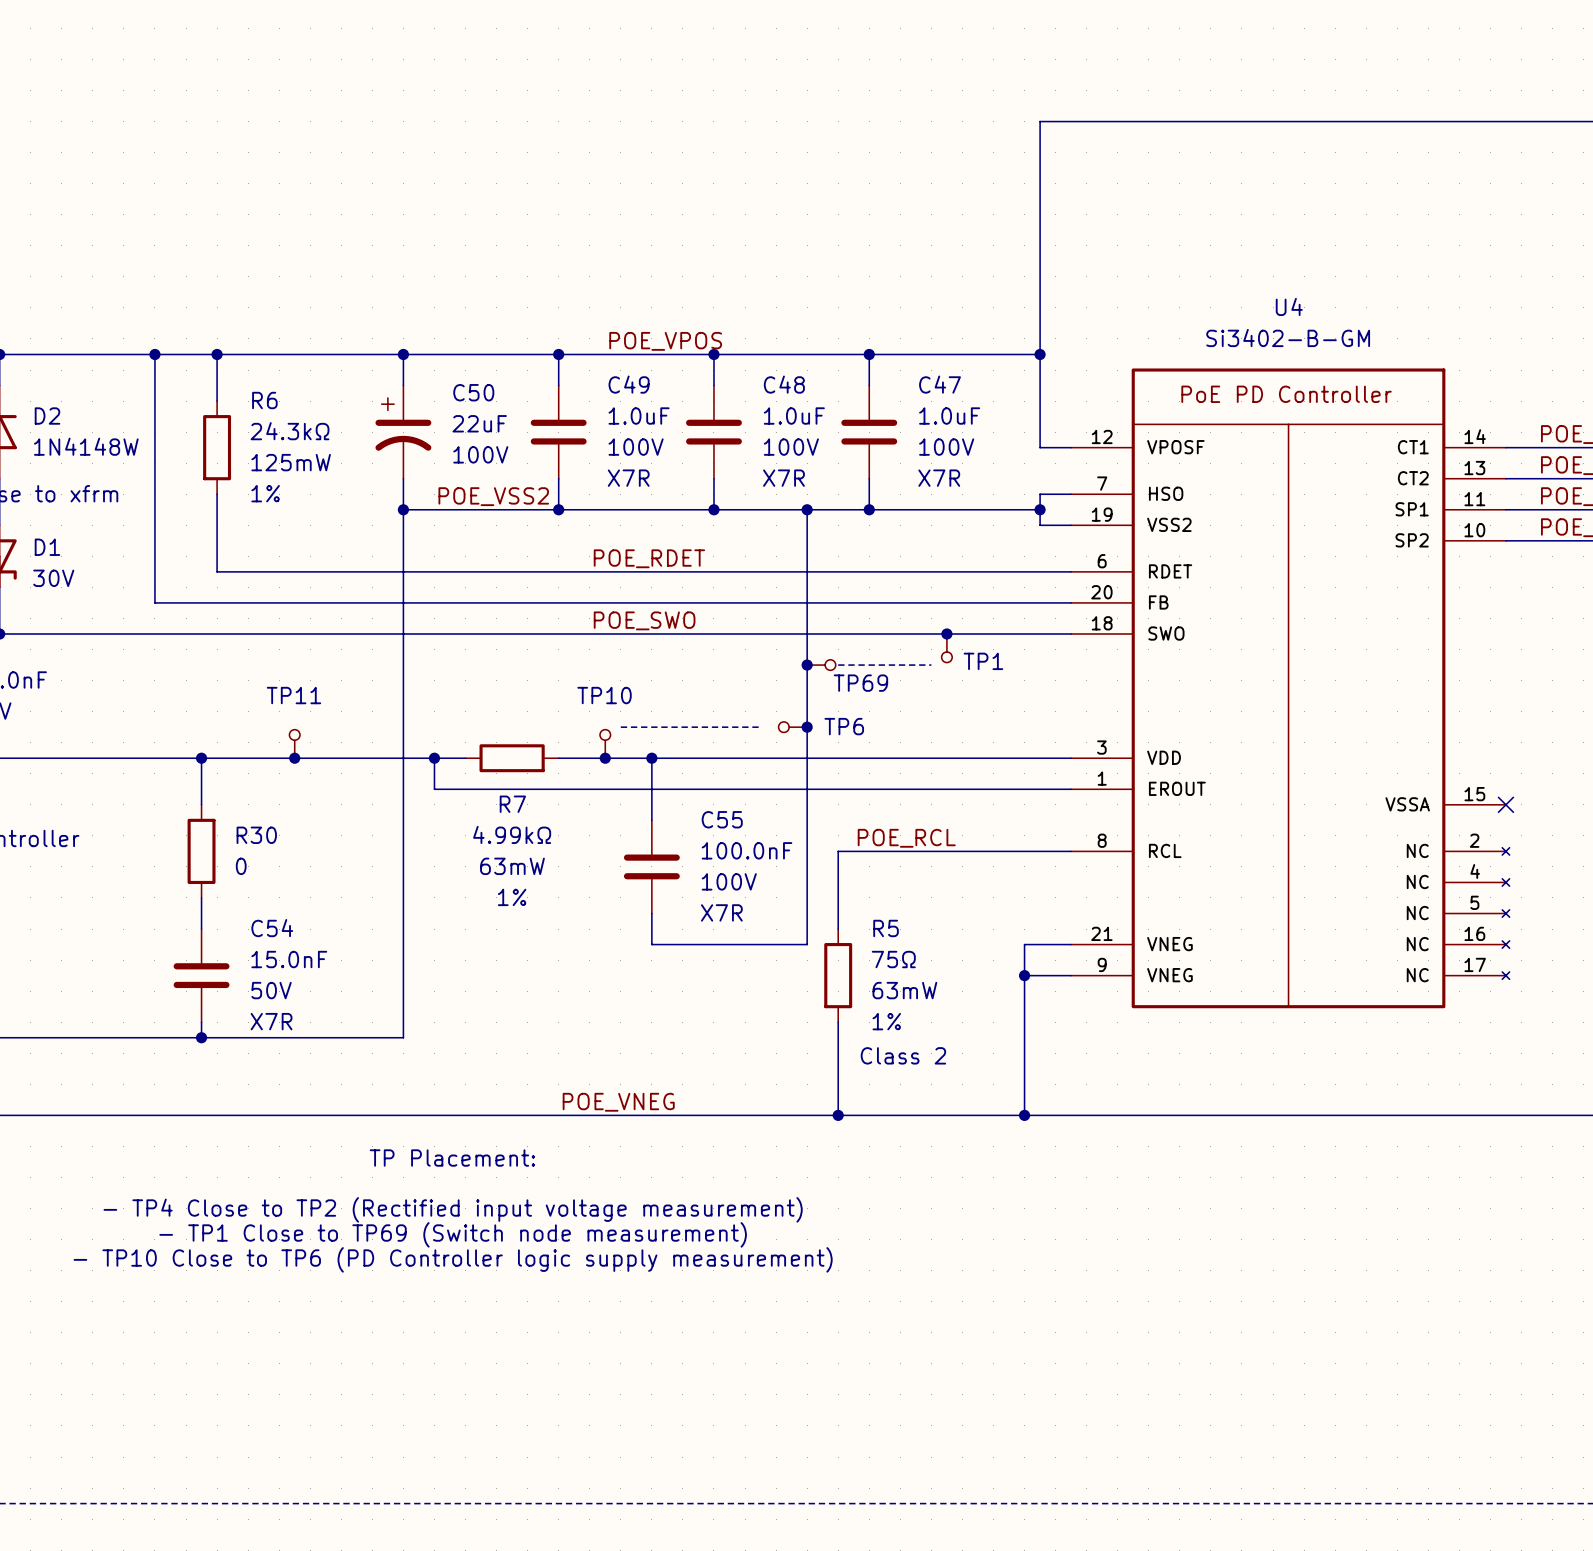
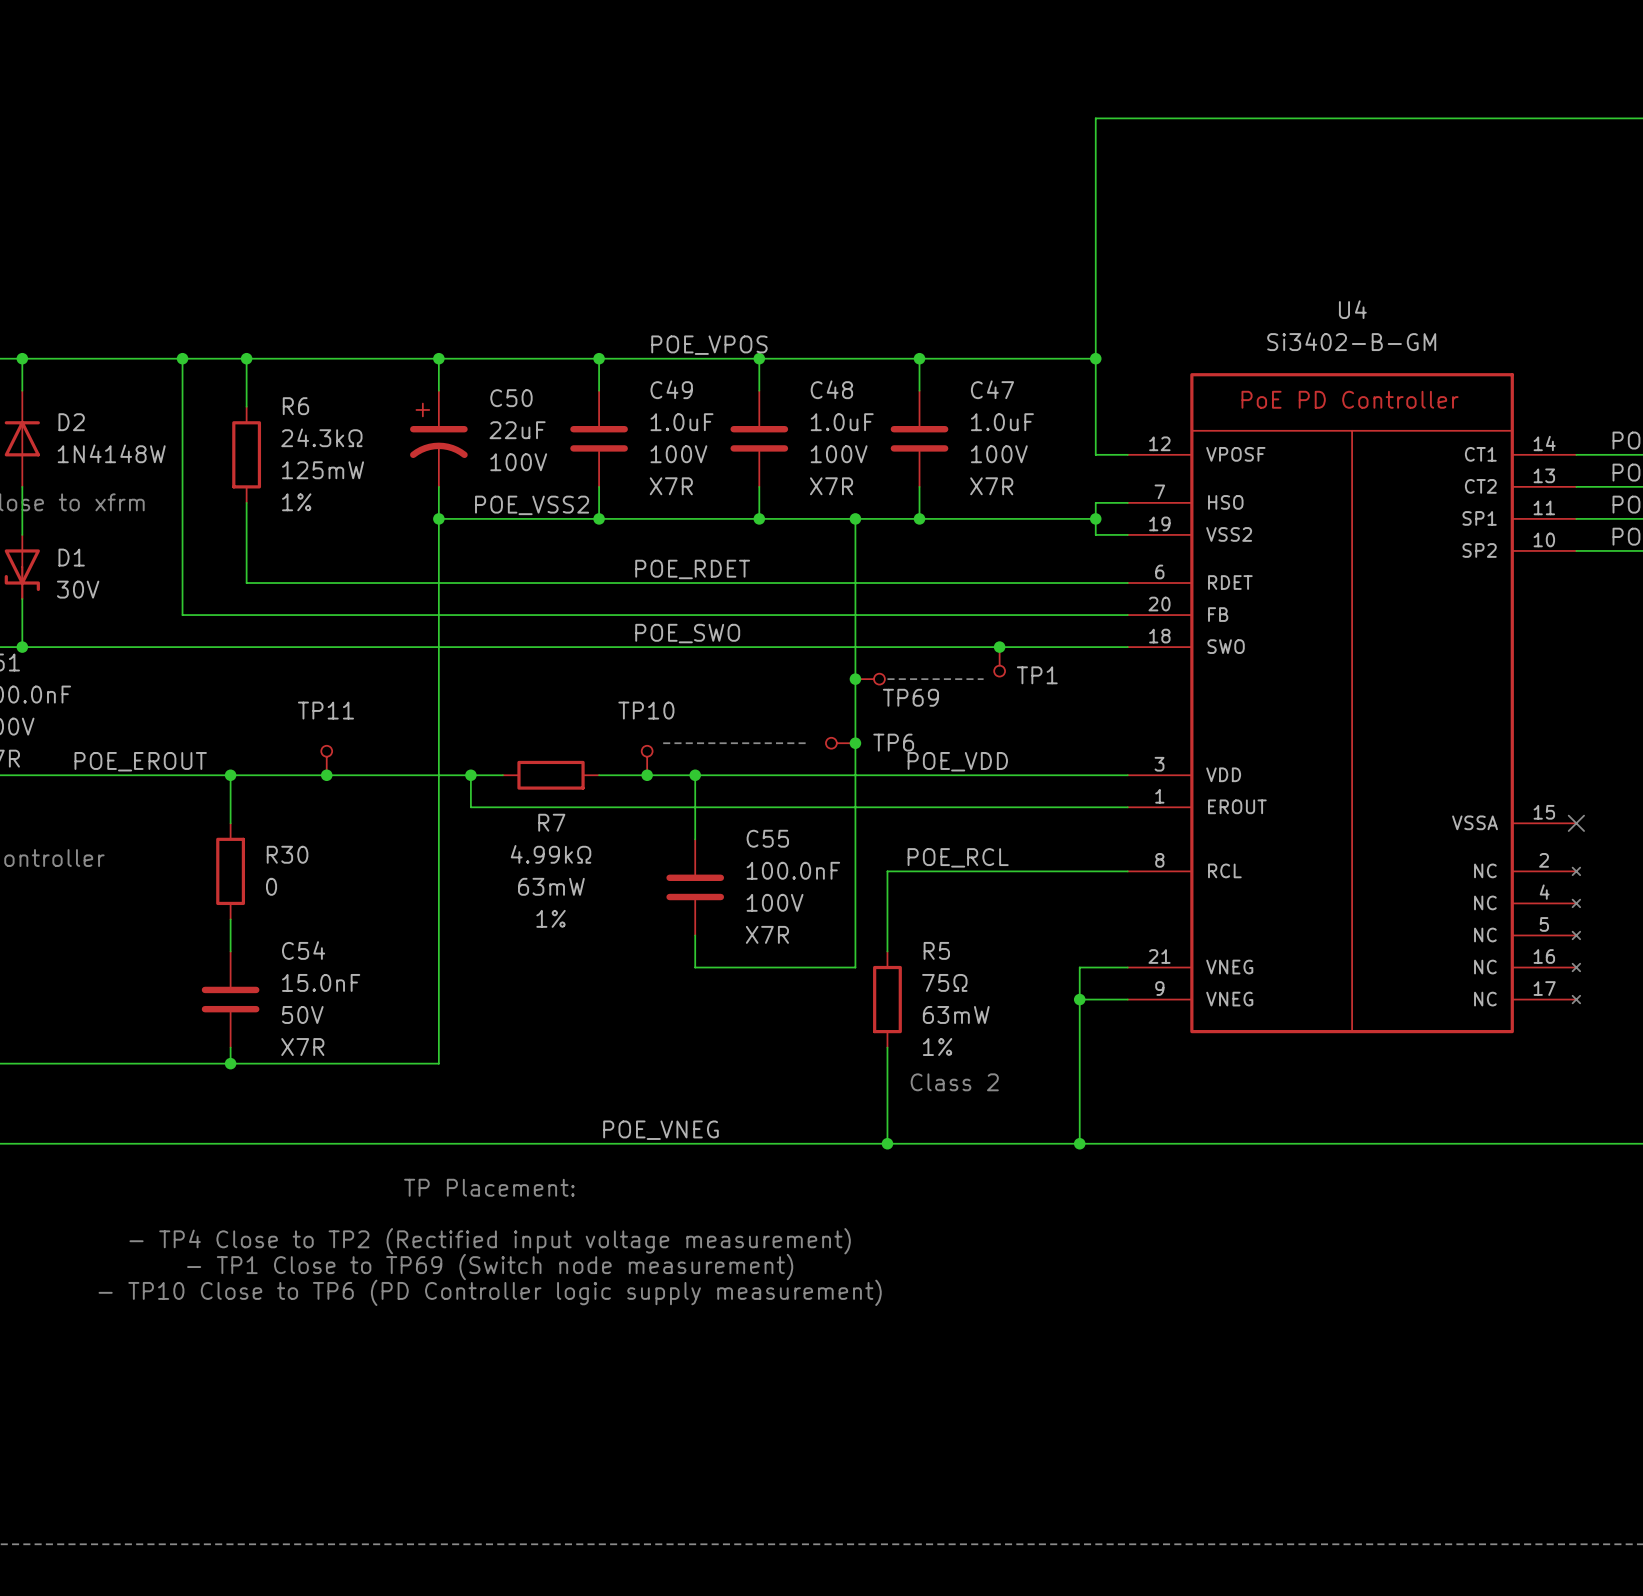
label: none -> POE_EROUT (140, 761)
label: none -> POE_VDD (957, 761)

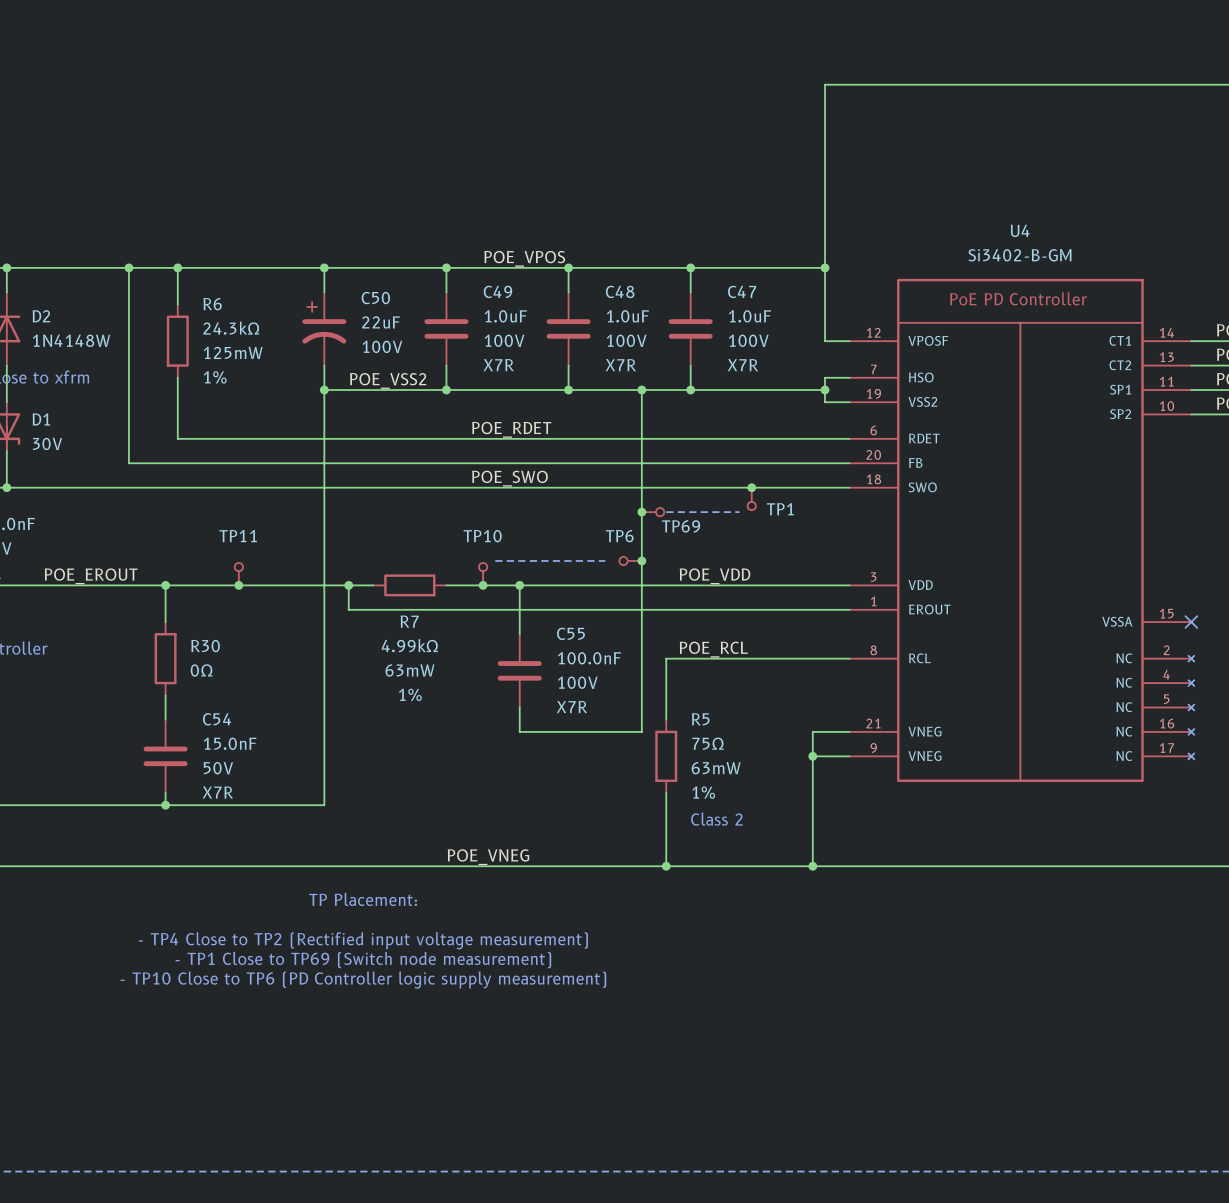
TP6 name position: TP6 (893, 742) -> TP6 (619, 536)
R30 value: 0 (271, 886) -> 0Ω (201, 670)

